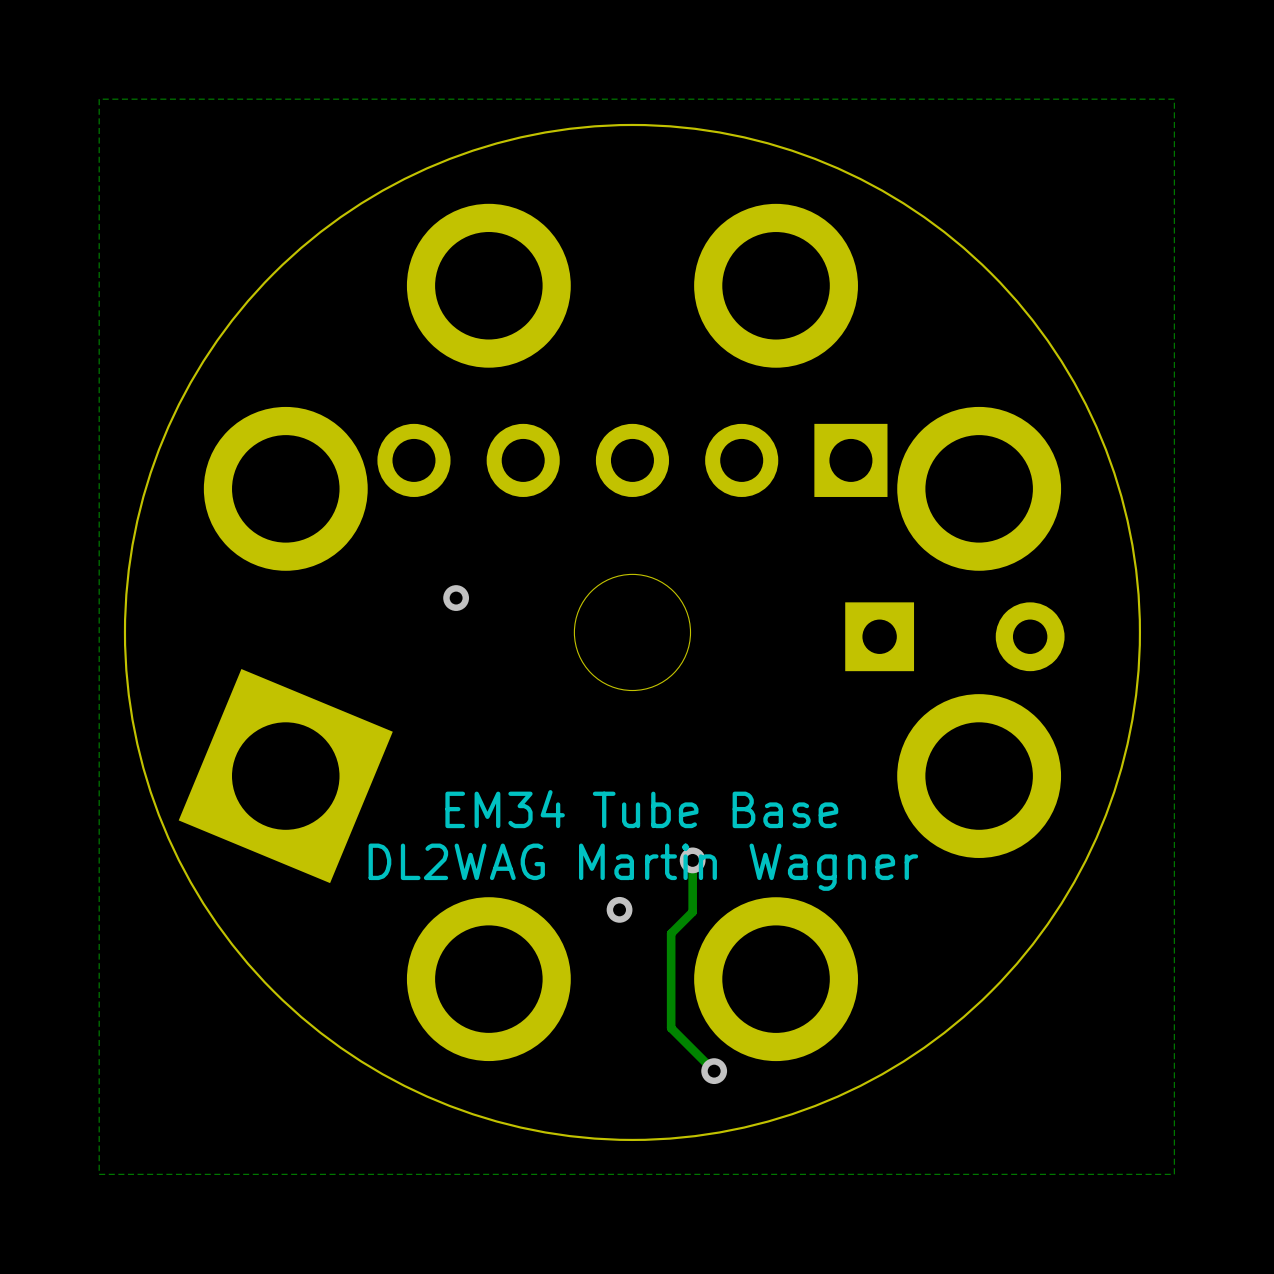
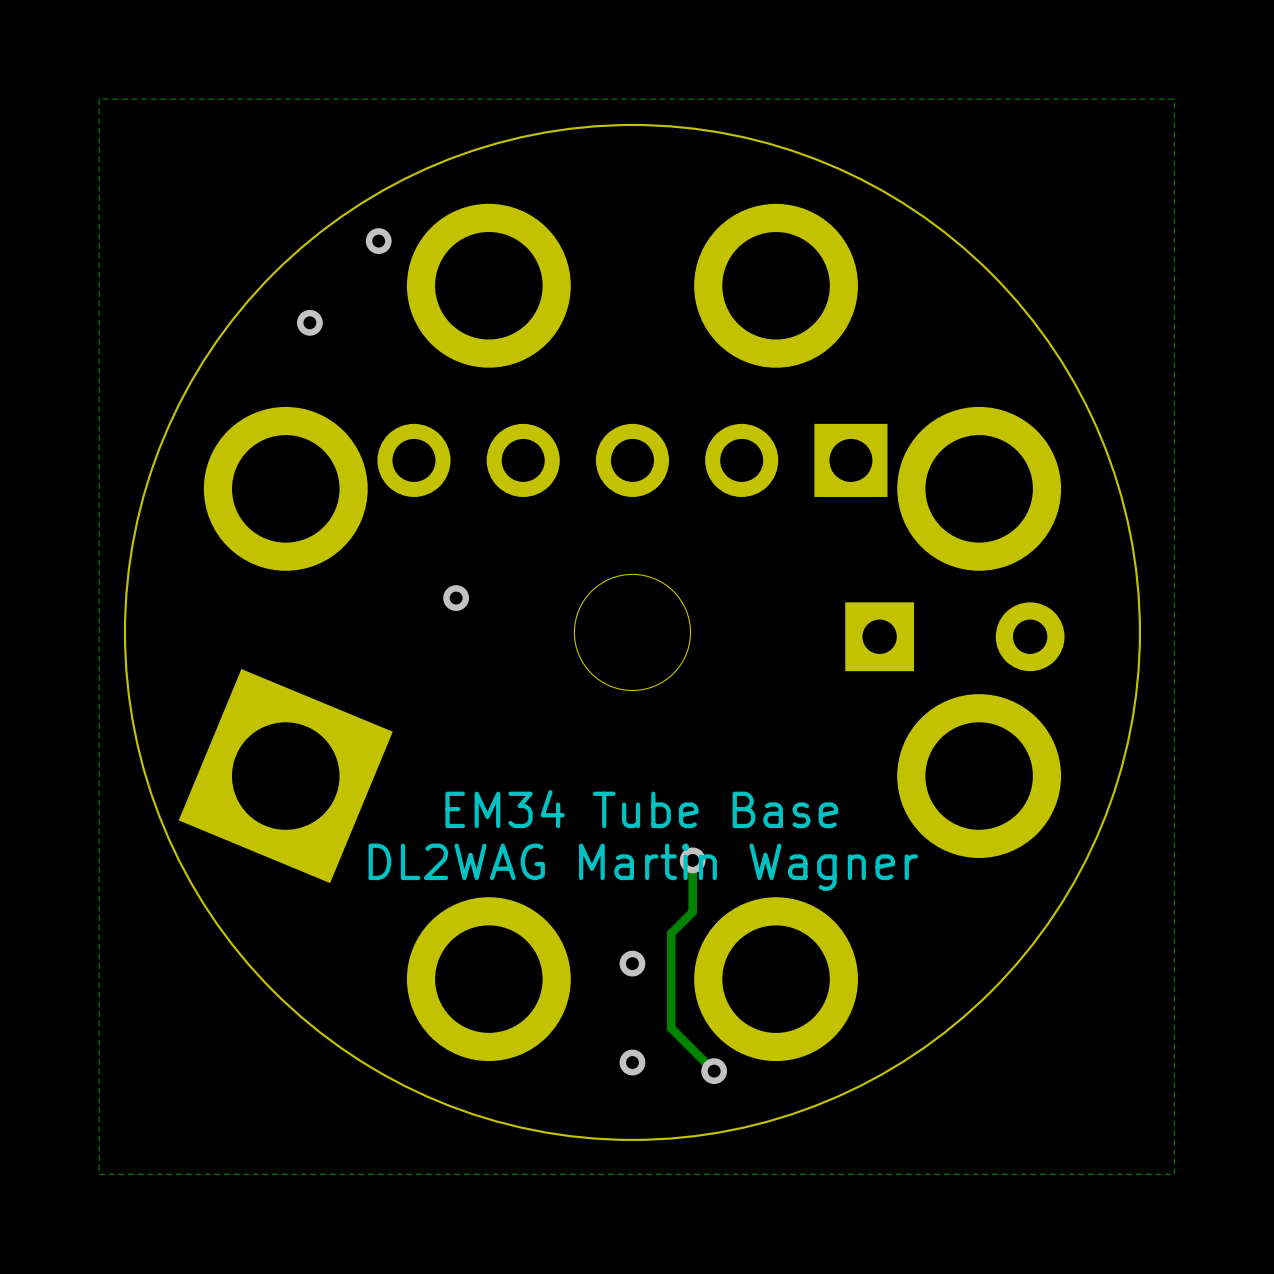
via: none -> (378, 241)
via: none -> (309, 322)
via position: (619, 909) -> (632, 963)
via: none -> (632, 1062)

